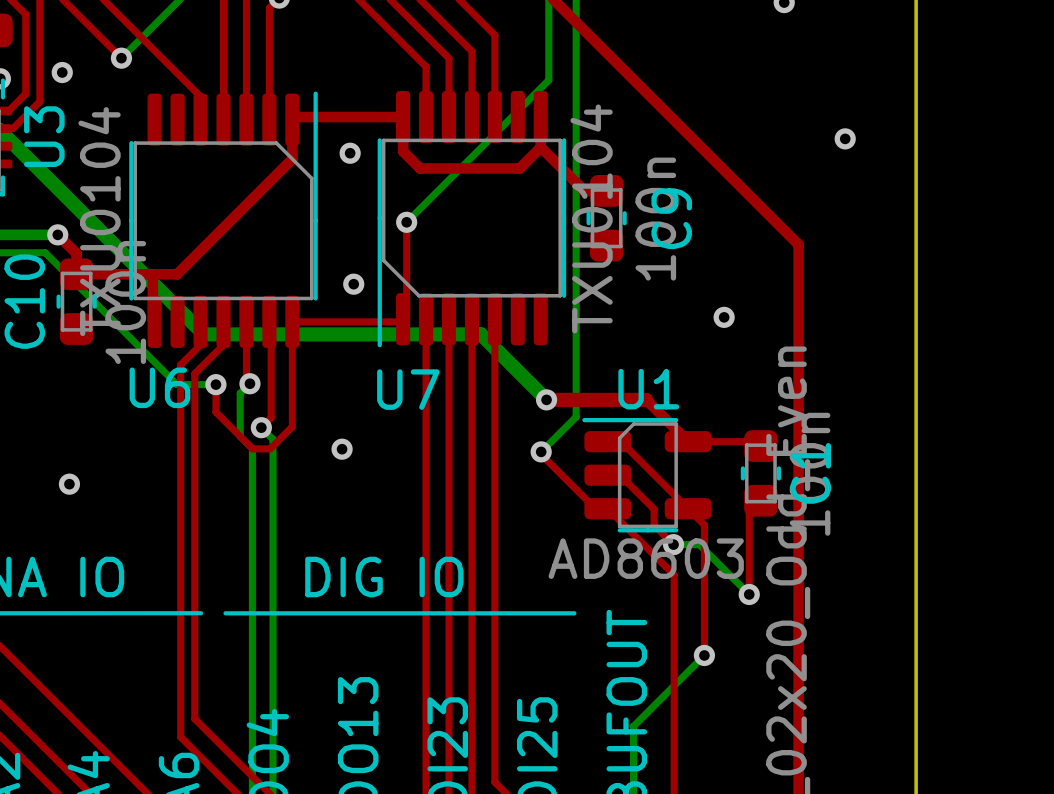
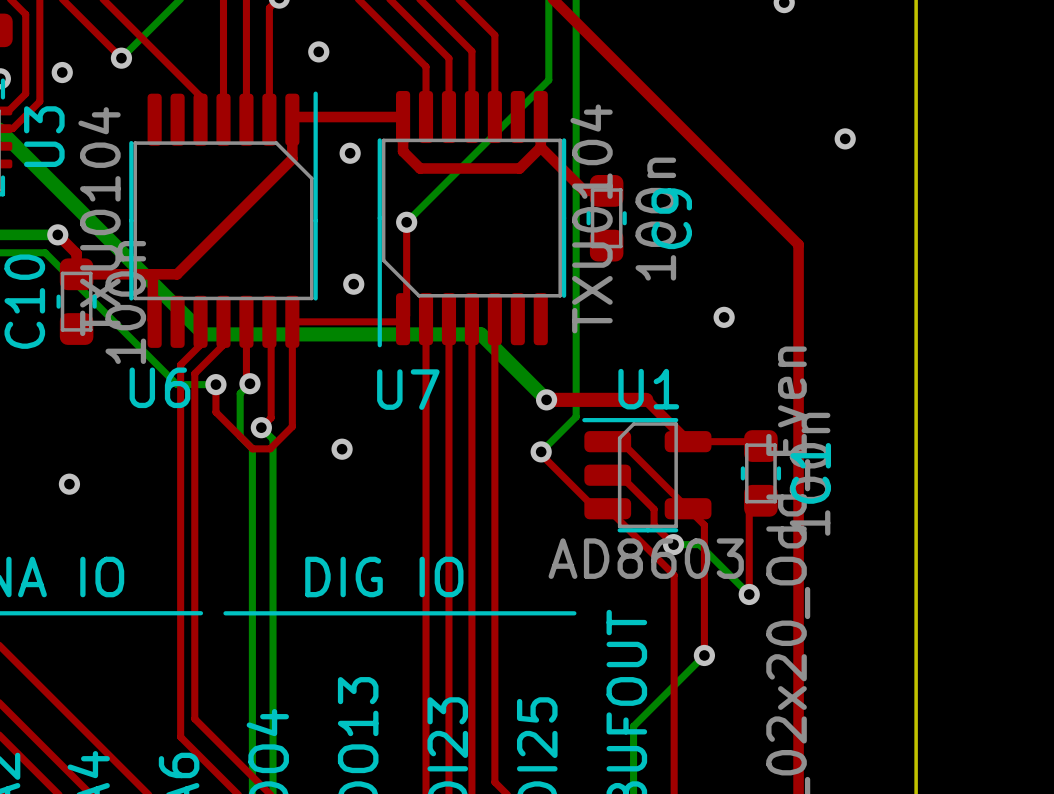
via: none -> (318, 51)

